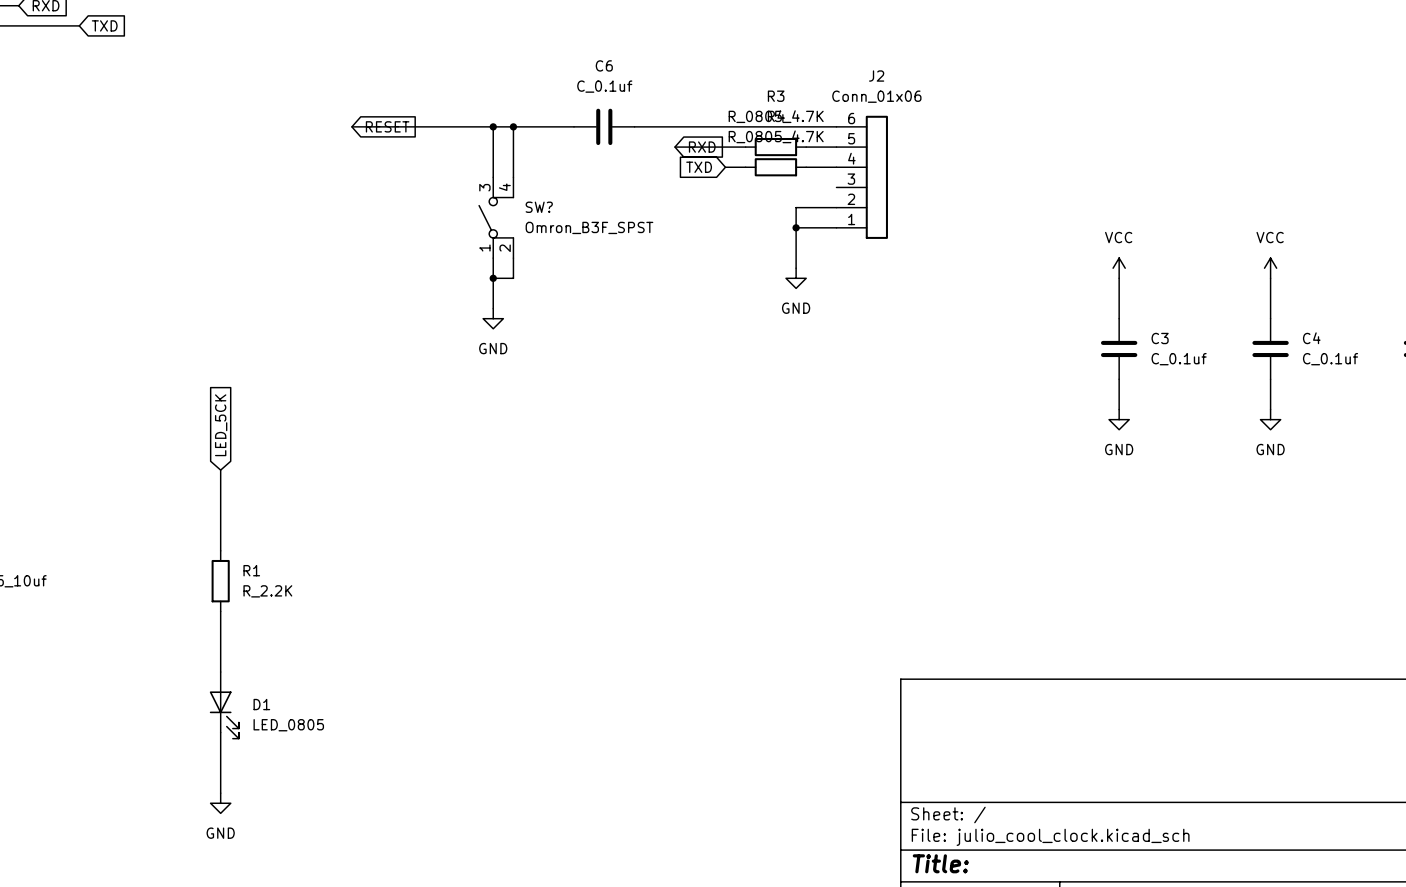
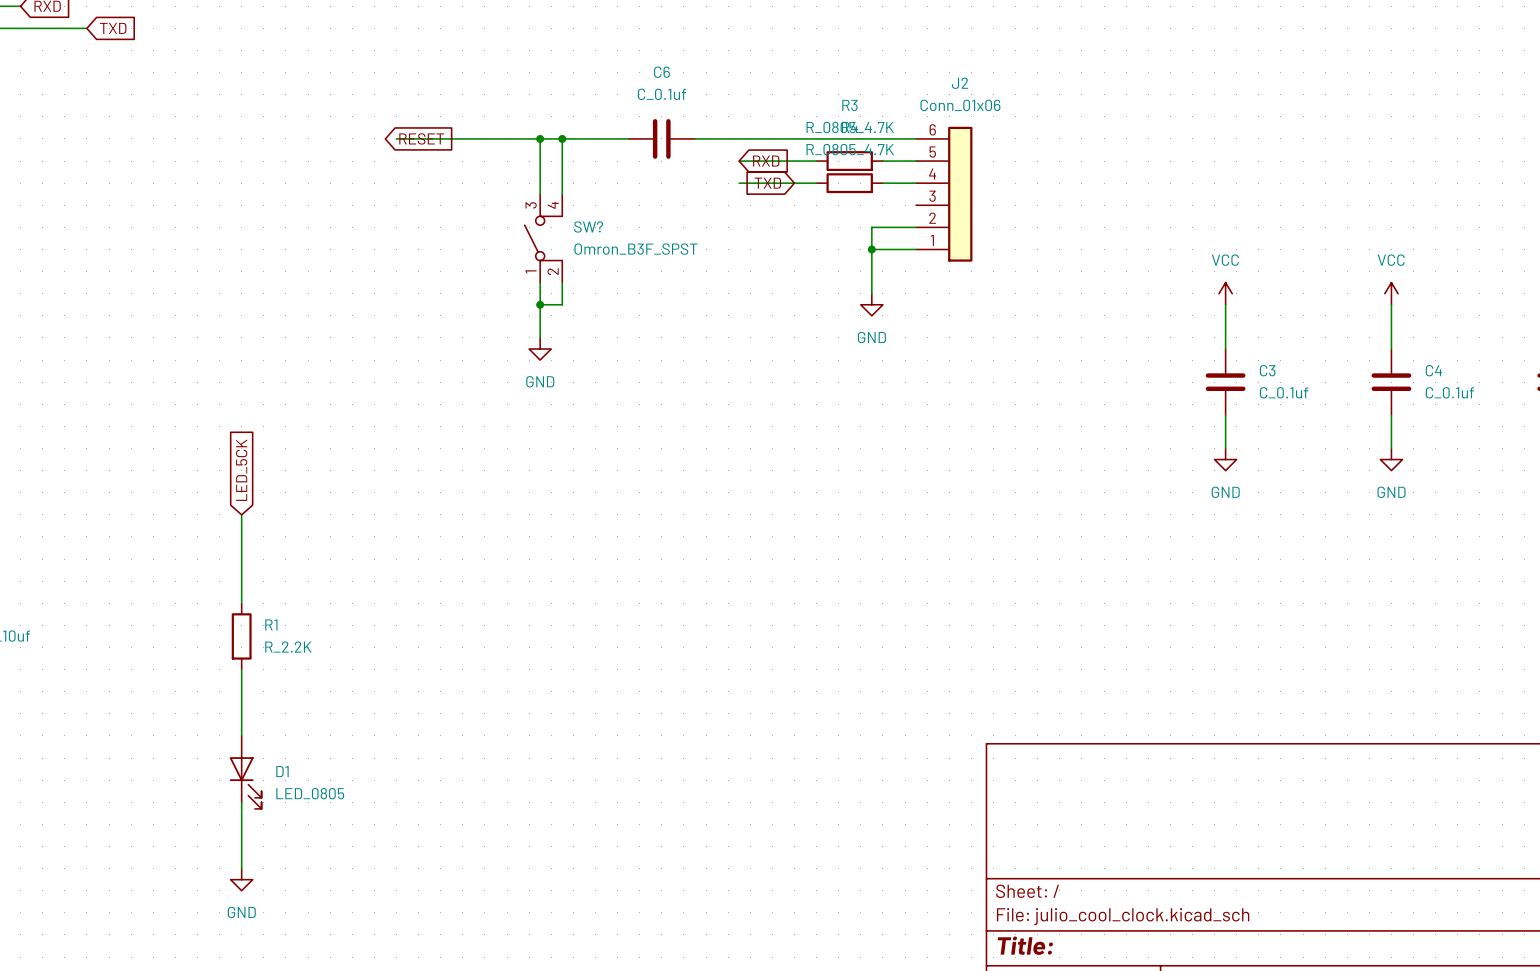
wire: (351, 126) (362, 126) -> none
wire: none -> (739, 183) (794, 183)

